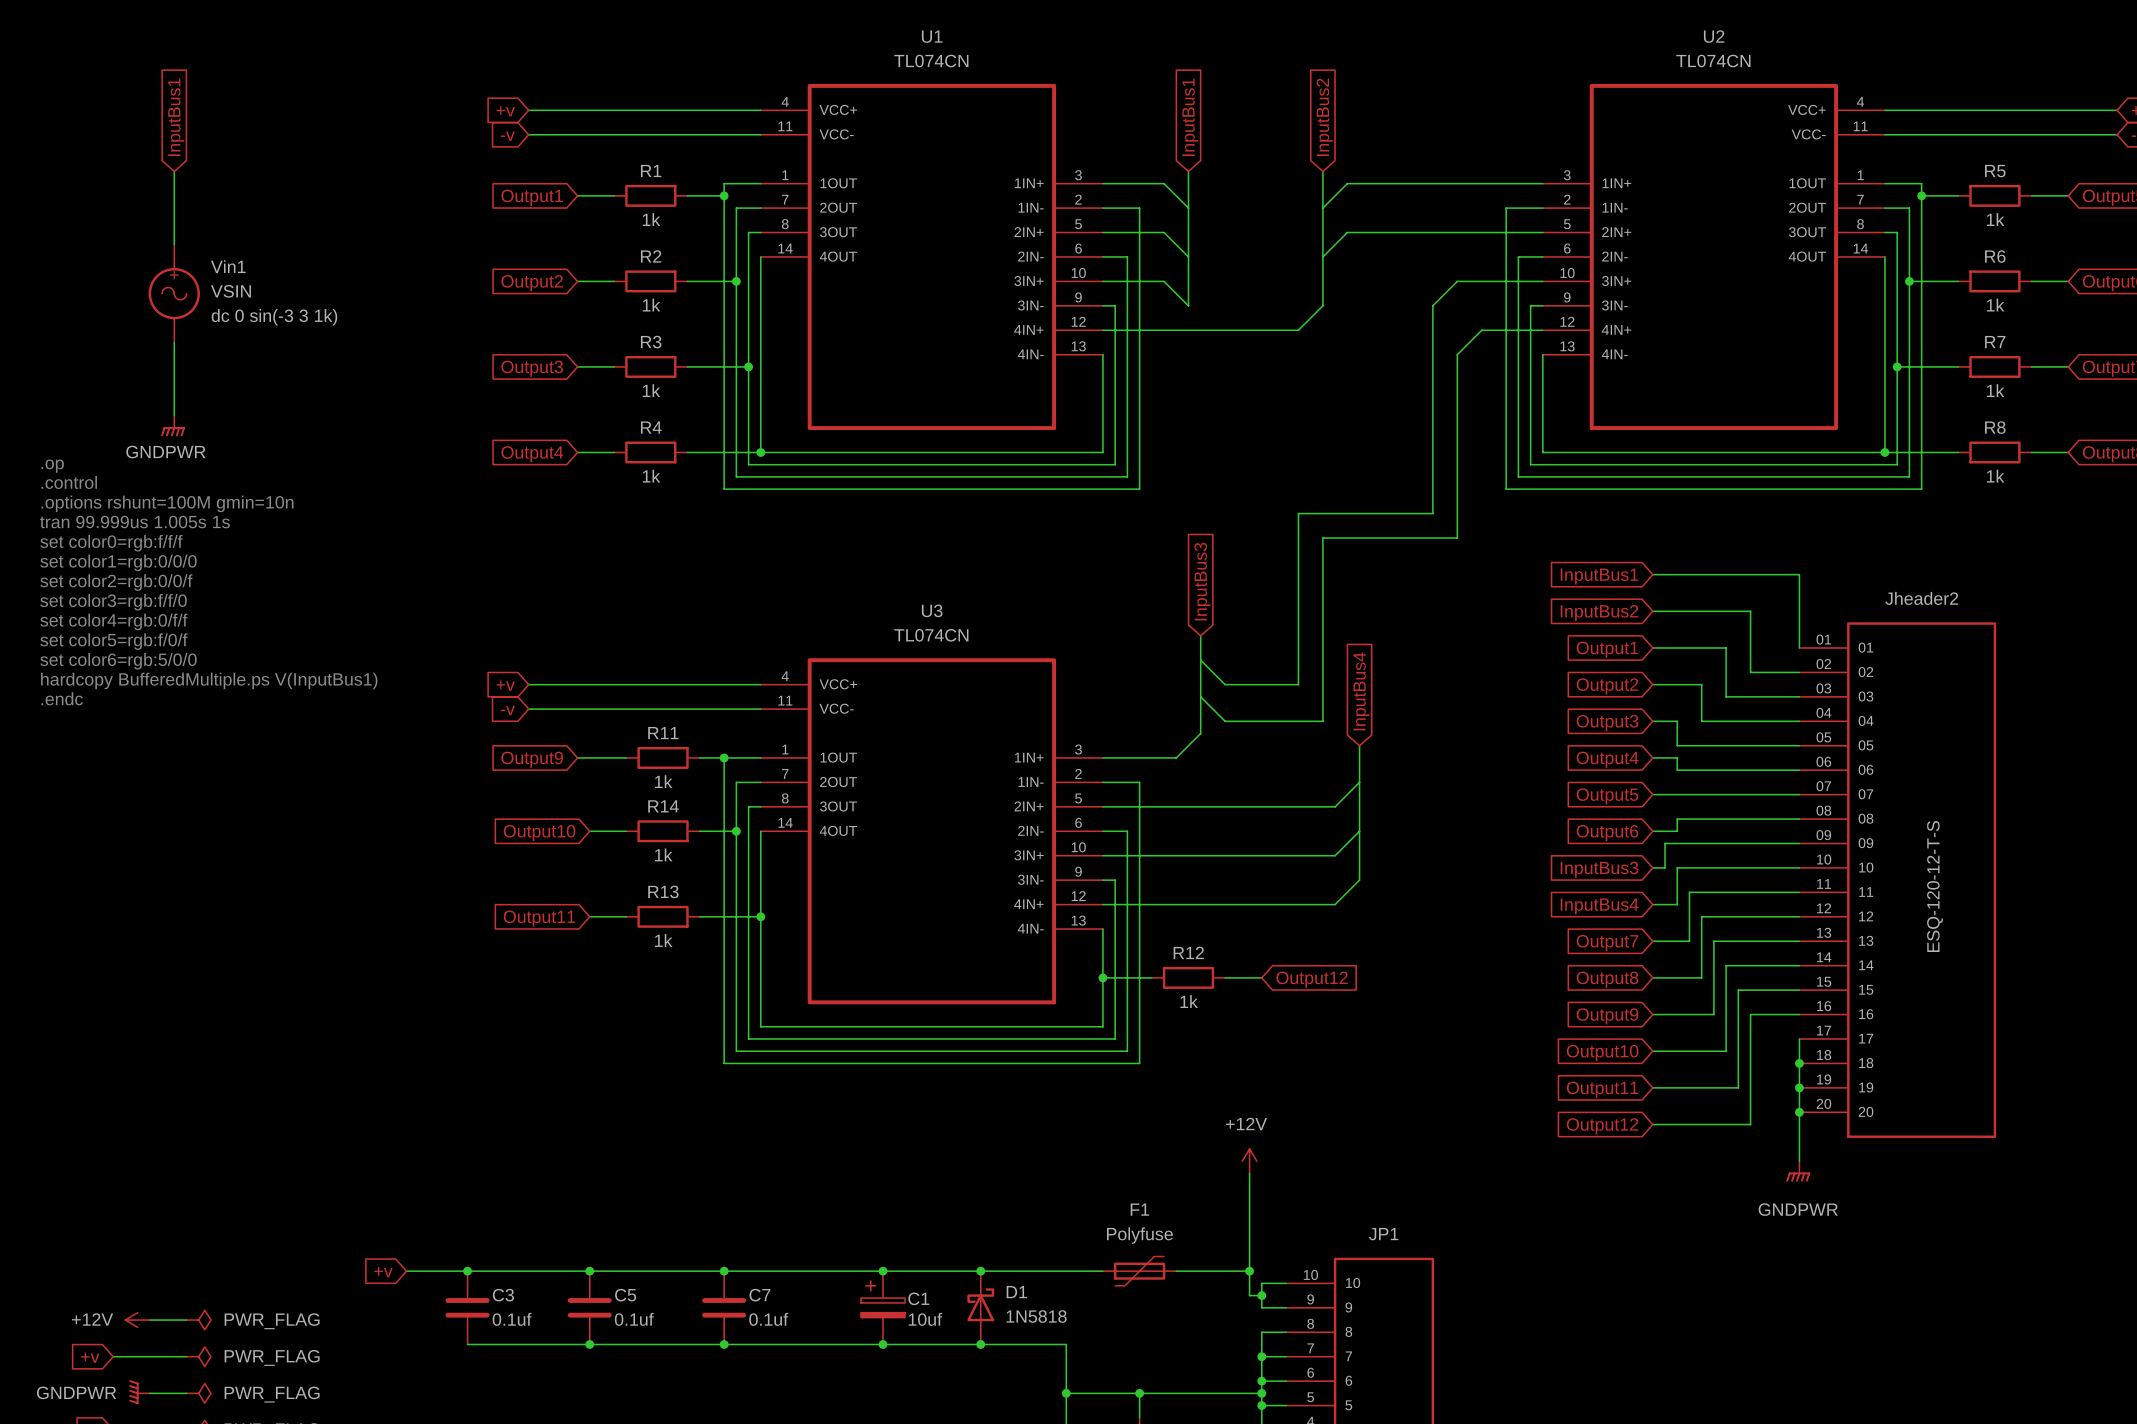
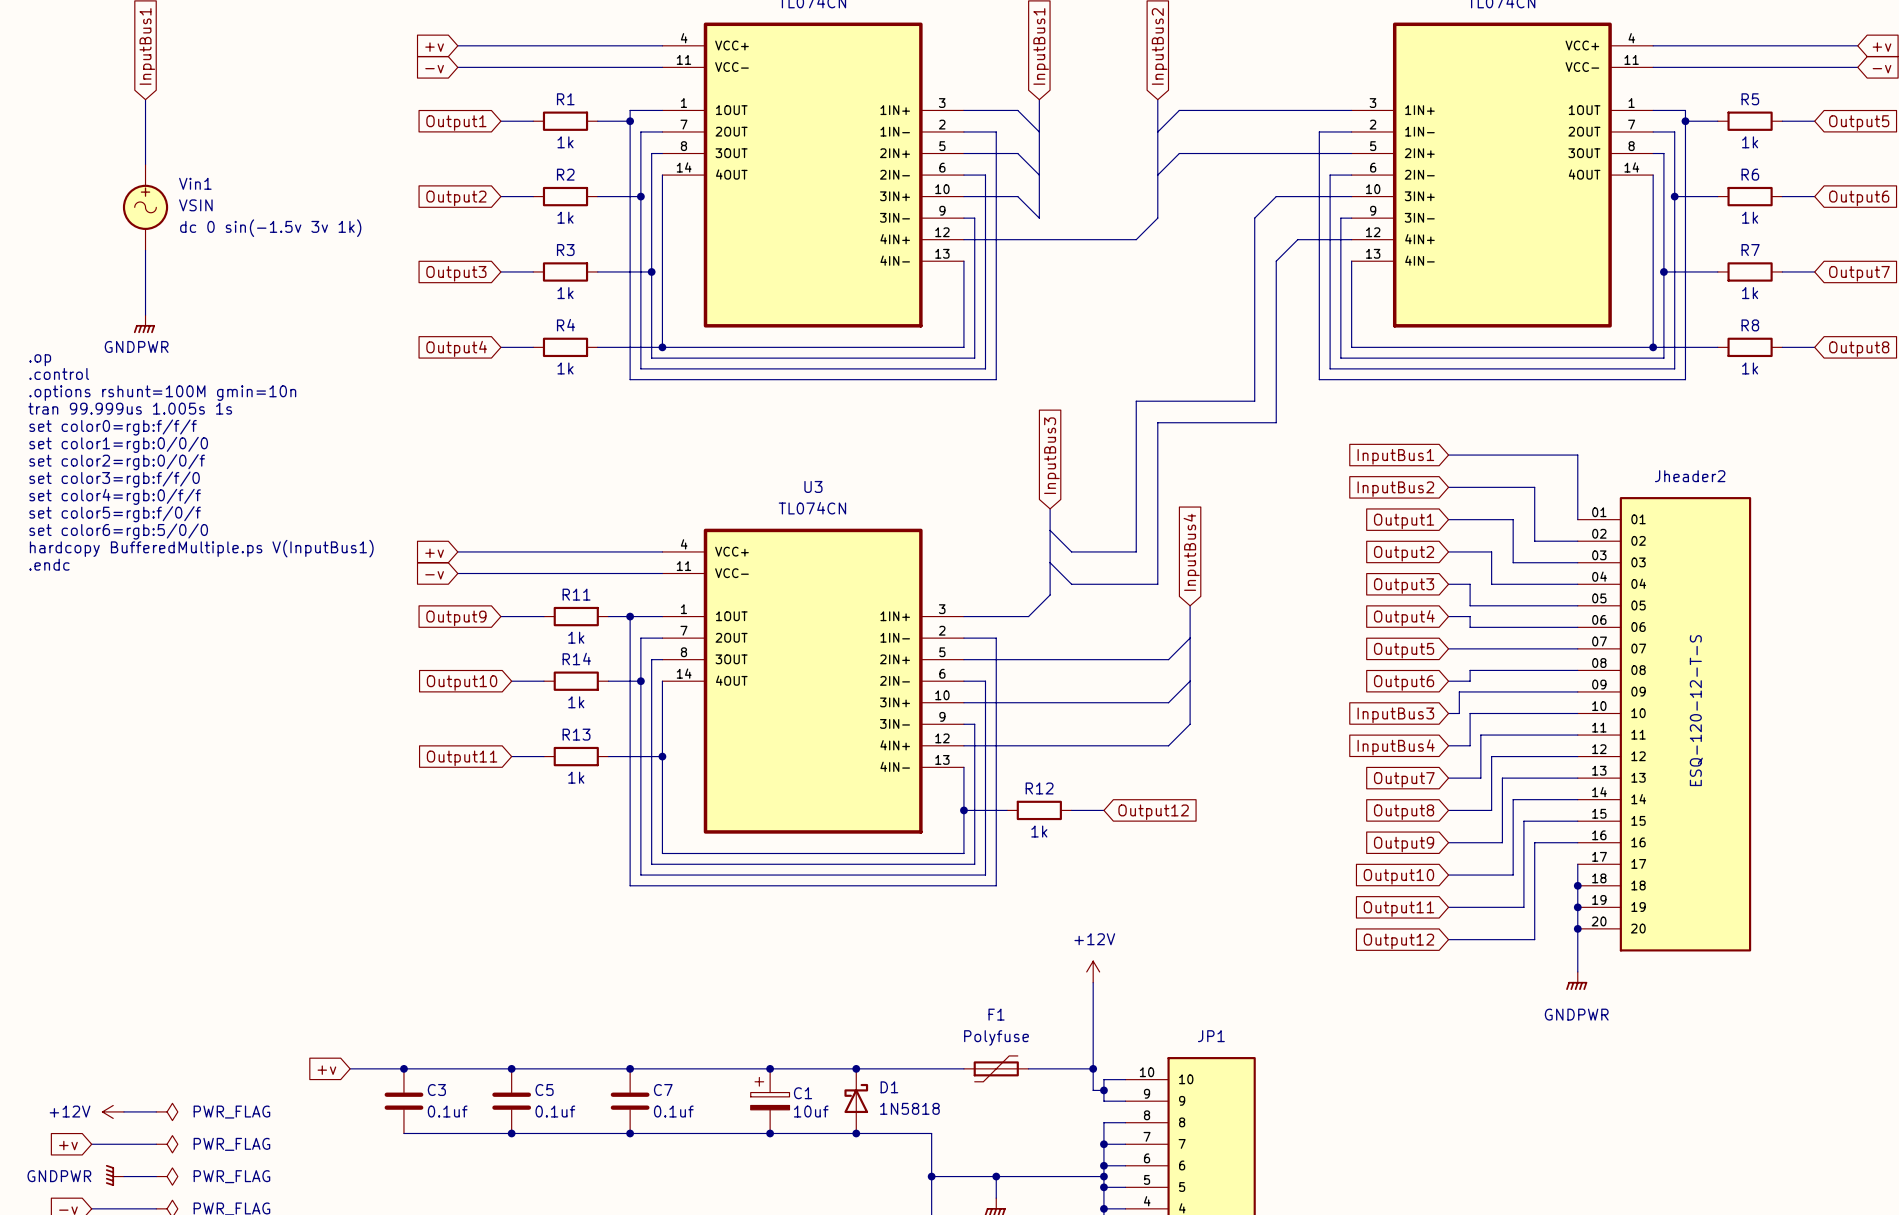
Vin1 text: dc 0 sin(-3 3 1k) (274, 317) -> dc 0 sin(-1.5v 3v 1k) (270, 228)

